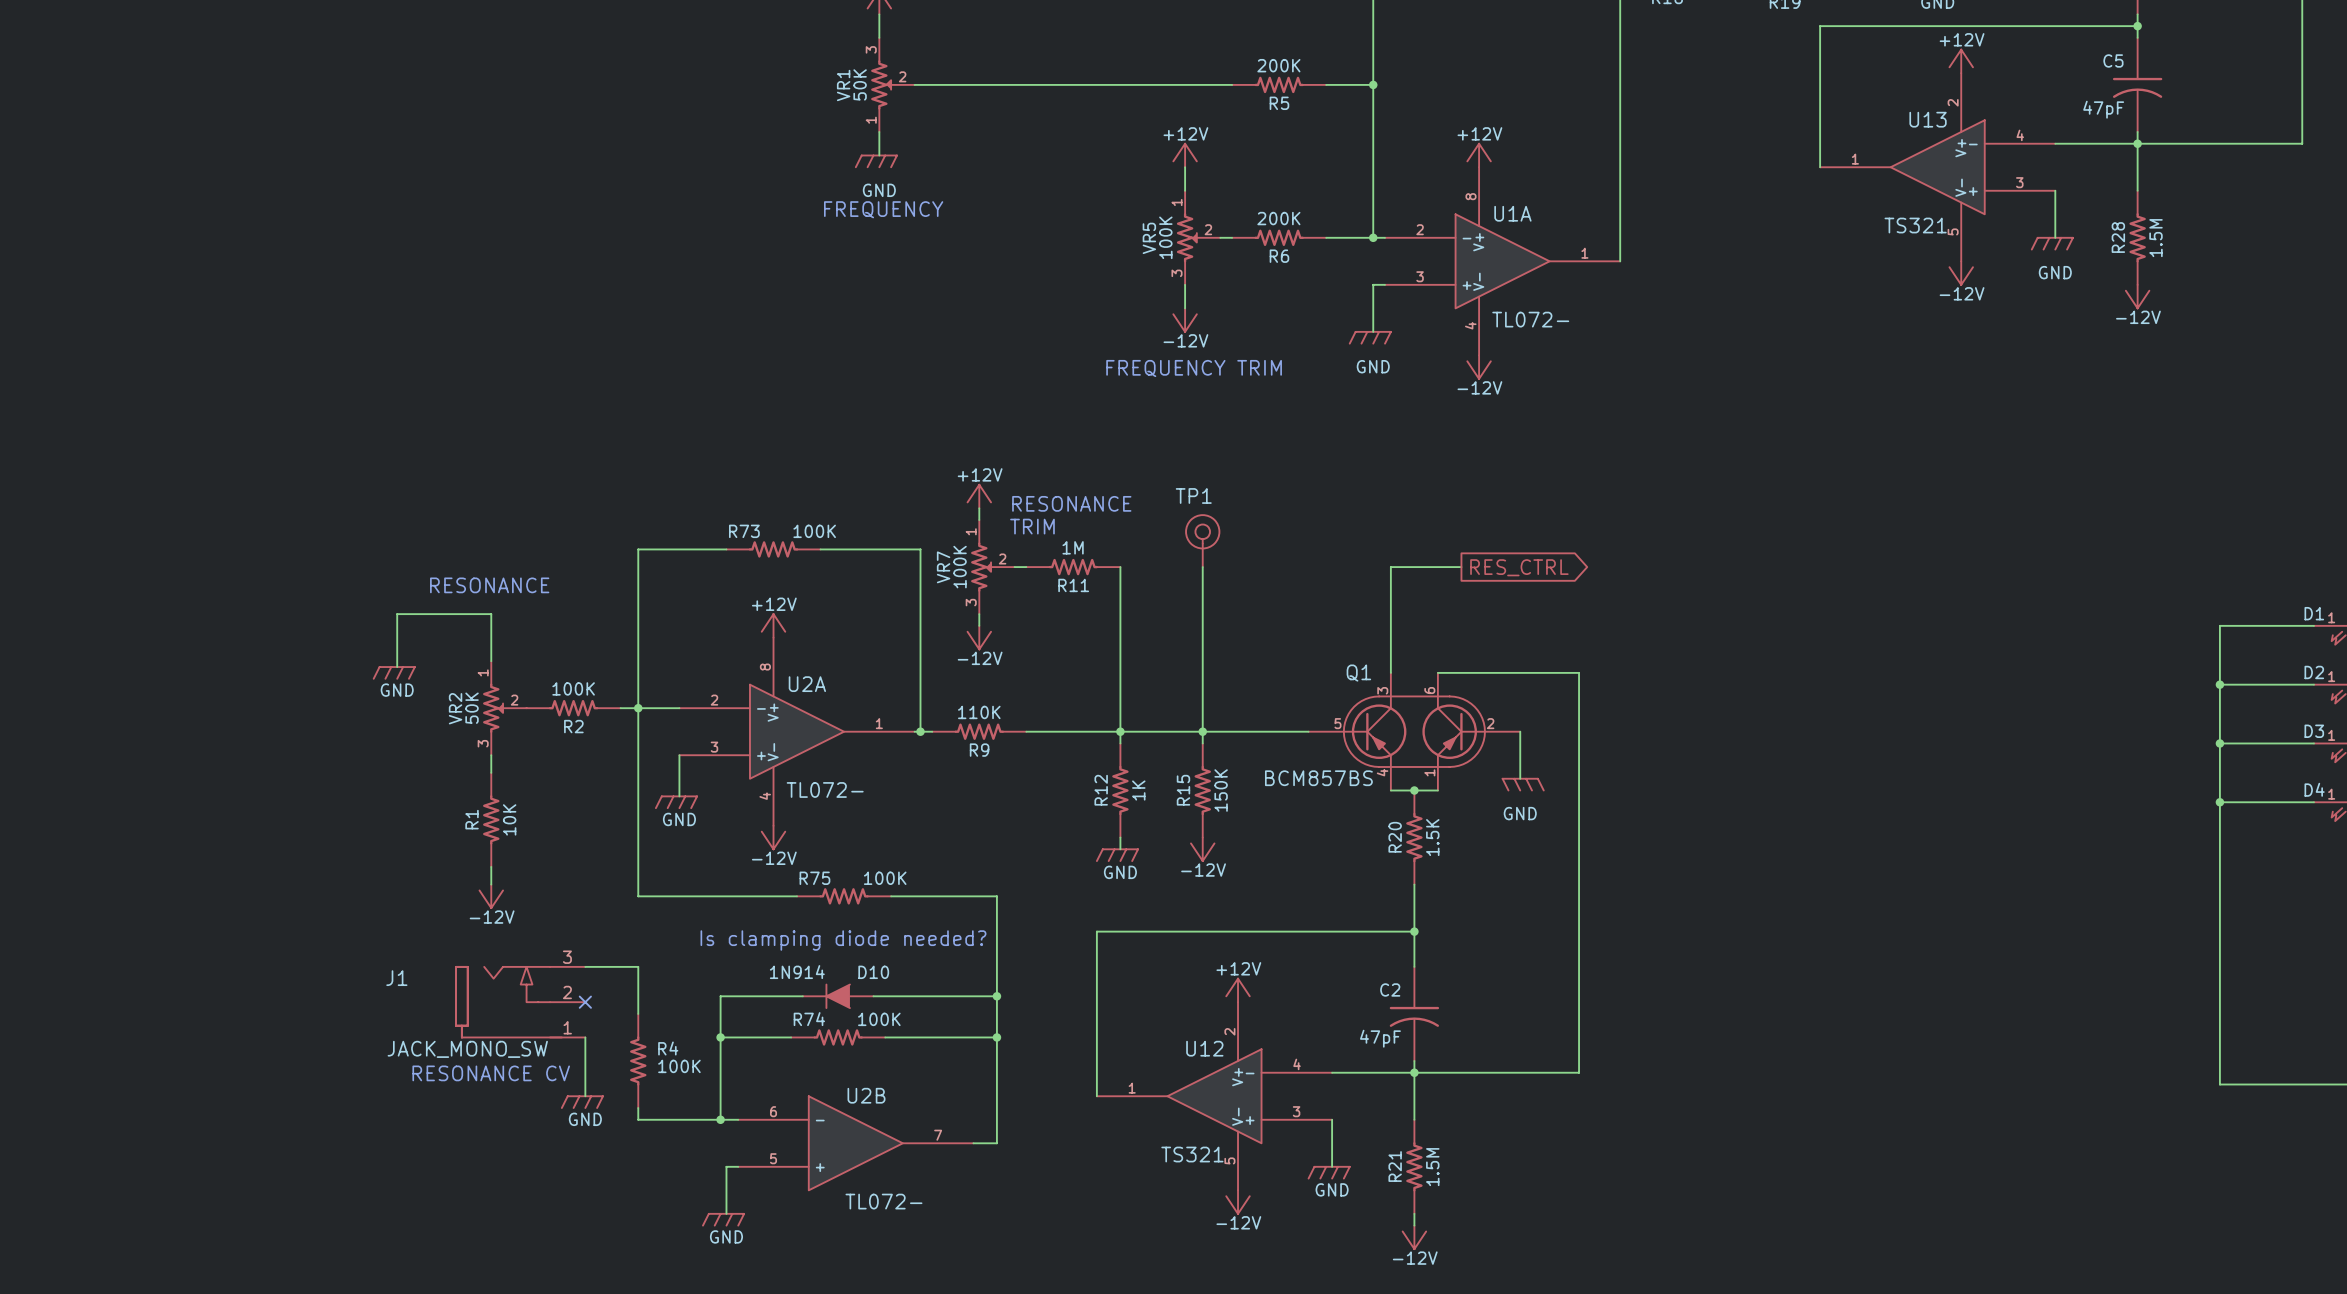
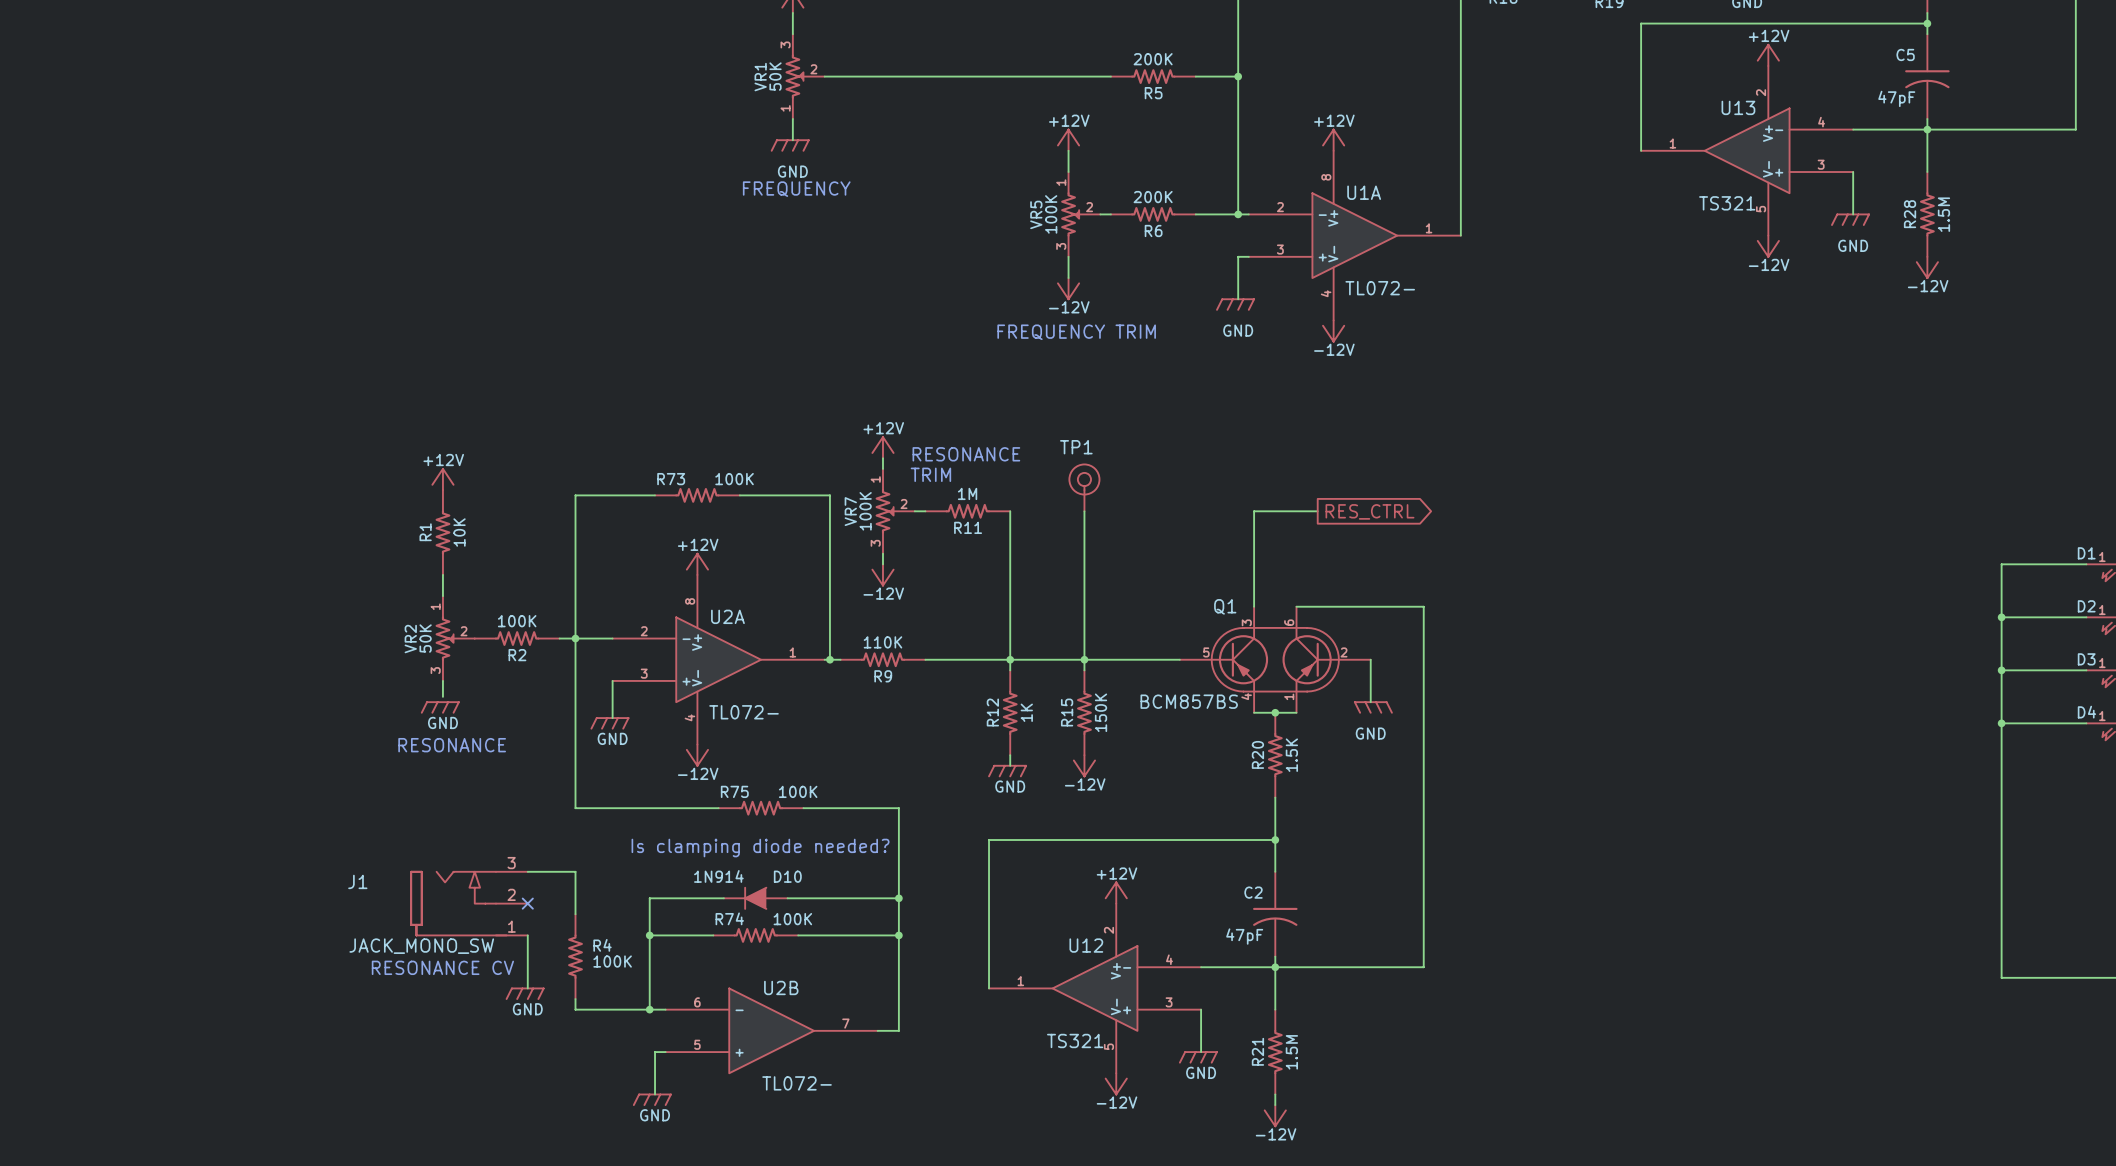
power symbol: none -> +12V (442, 479)
text: RESONANCE (489, 585) -> none
wire: (491, 637) (491, 614) (397, 614) (397, 667) -> none
power symbol position: GND (394, 672) -> GND (440, 707)
R1 position: (491, 819) -> (442, 532)
text: none -> RESONANCE (452, 745)
wire: (491, 866) (491, 884) -> none
power symbol: -12V (491, 896) -> none

